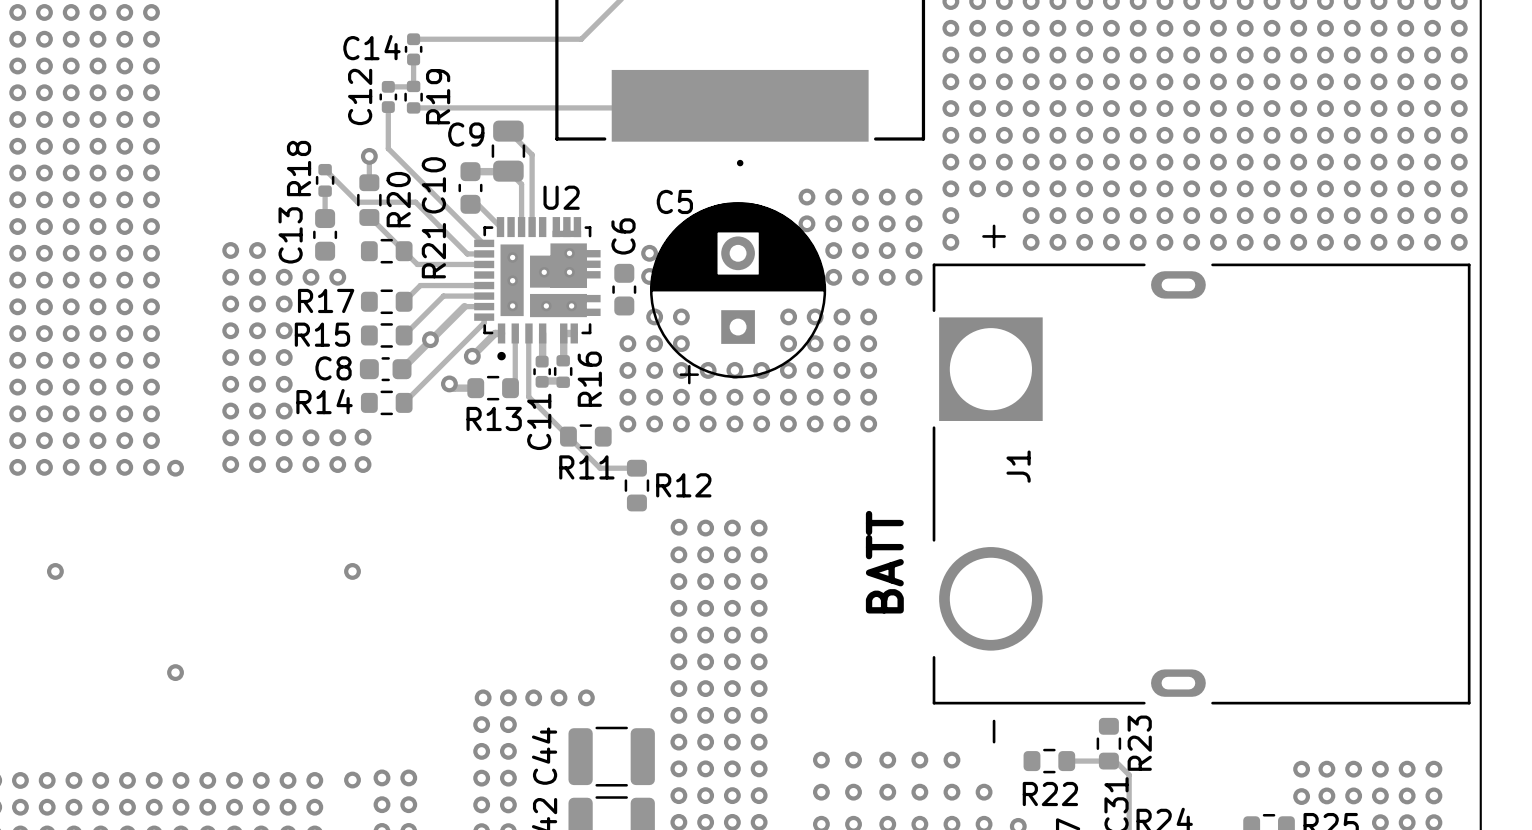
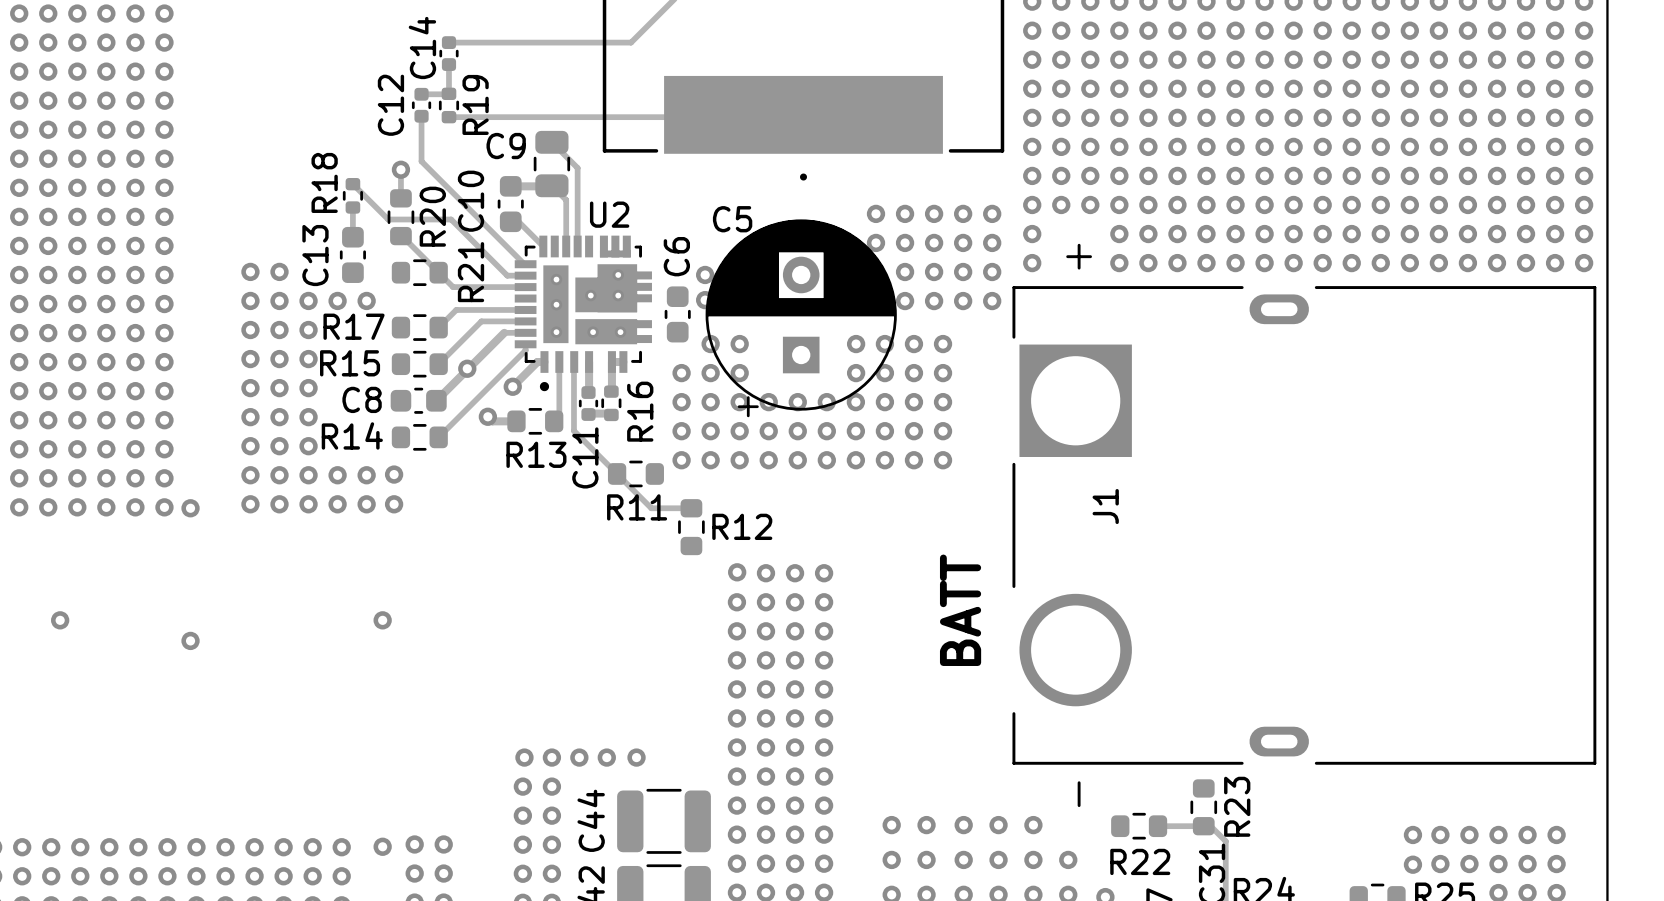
C14 name rotation: 0° (371, 47) -> 90° counterclockwise (422, 47)
via position: (175, 672) -> (190, 640)

